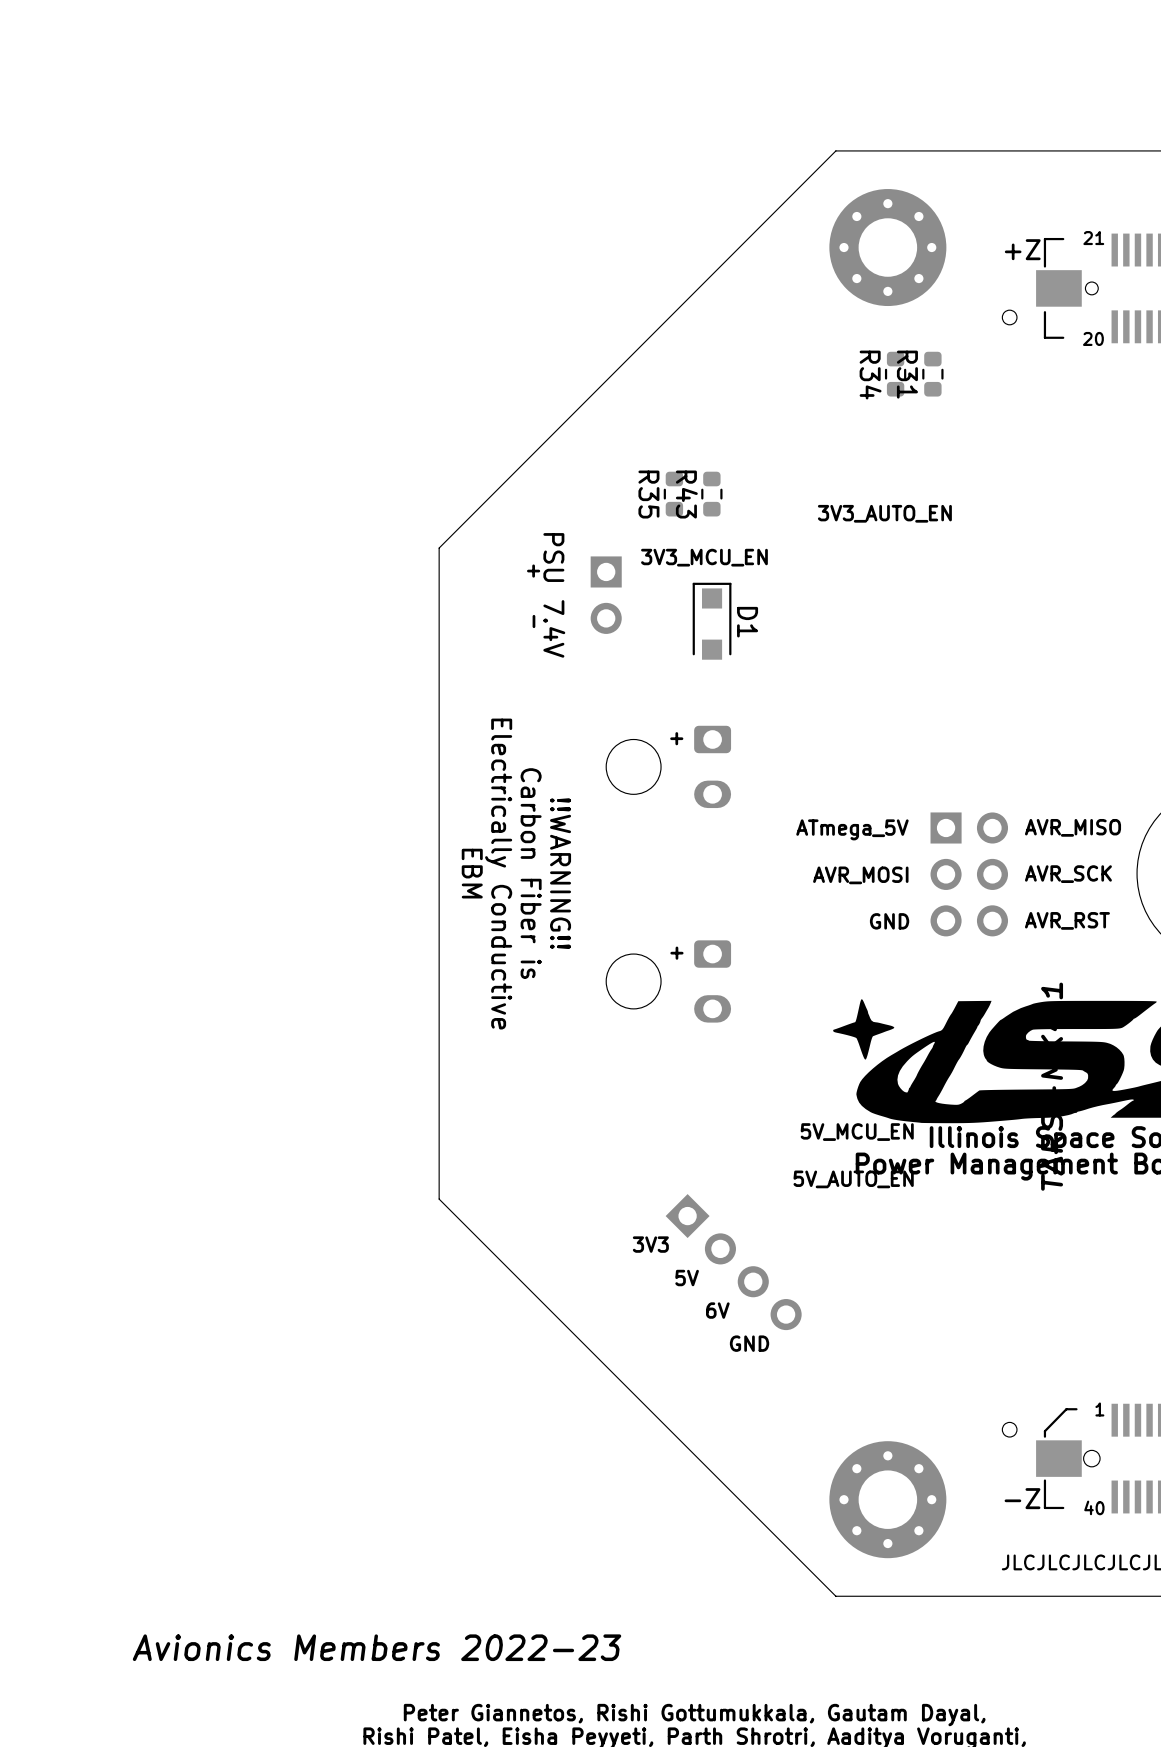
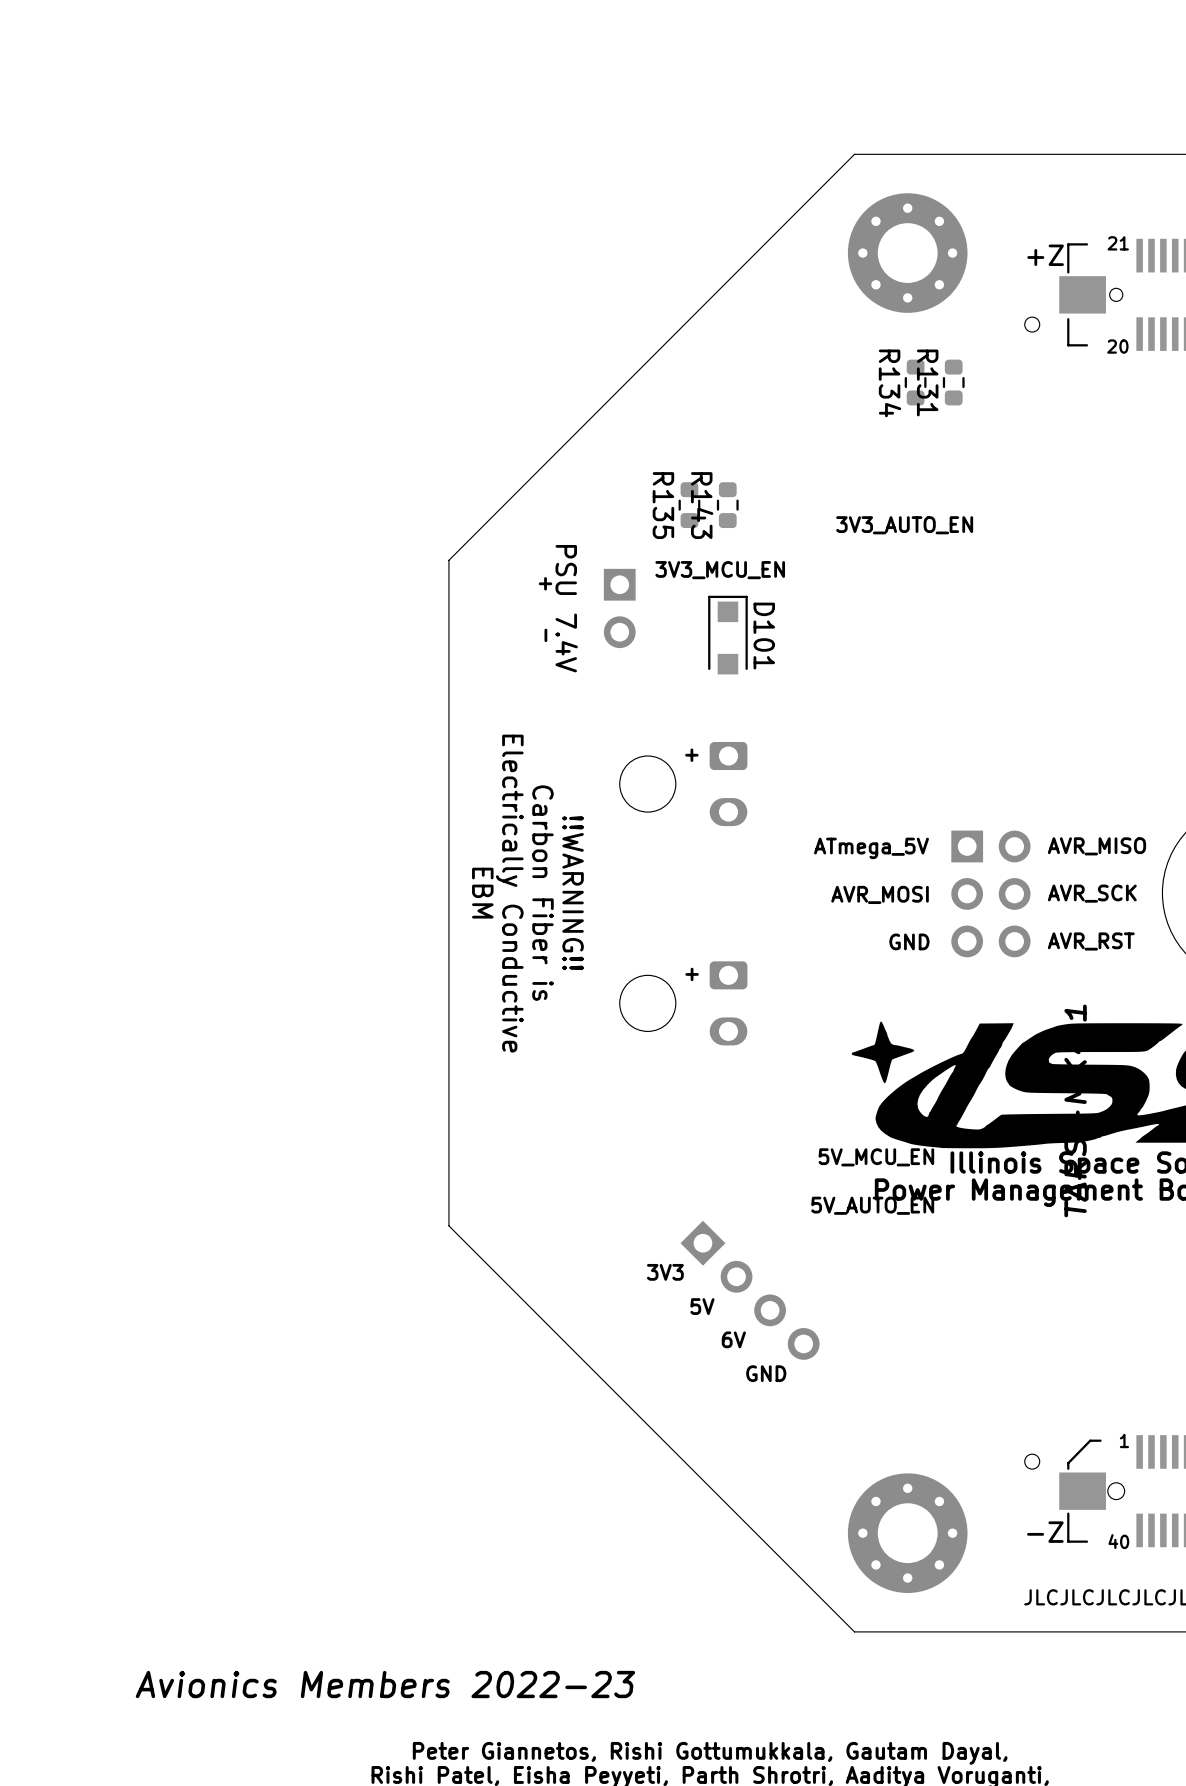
R31 name: R31 (907, 374) -> R131 (927, 382)
R34 name: R34 (870, 375) -> R134 (890, 383)
R35 name: R35 (648, 494) -> R135 (663, 505)
R43 name: R43 (686, 494) -> R143 (702, 505)
D1 name: D1 (747, 622) -> D101 (764, 636)

